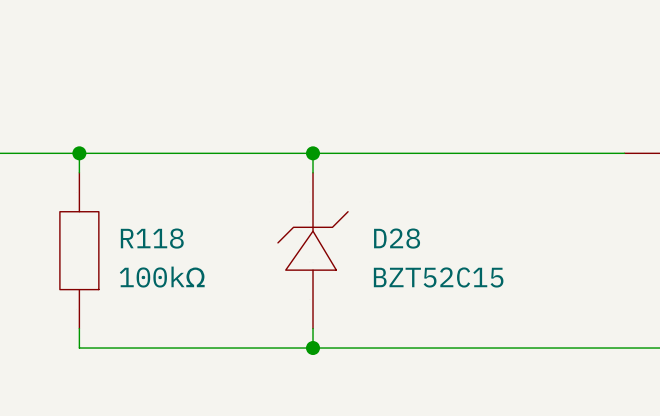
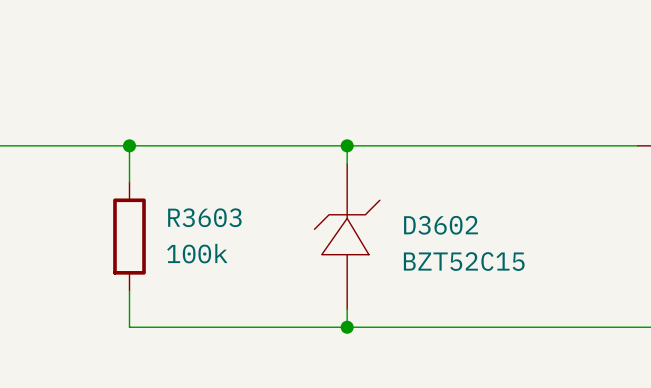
D28 name: D28 (397, 238) -> D3602 (440, 225)
R118: 100kΩ (79, 250) -> none
R3603: none -> 100k (129, 236)

